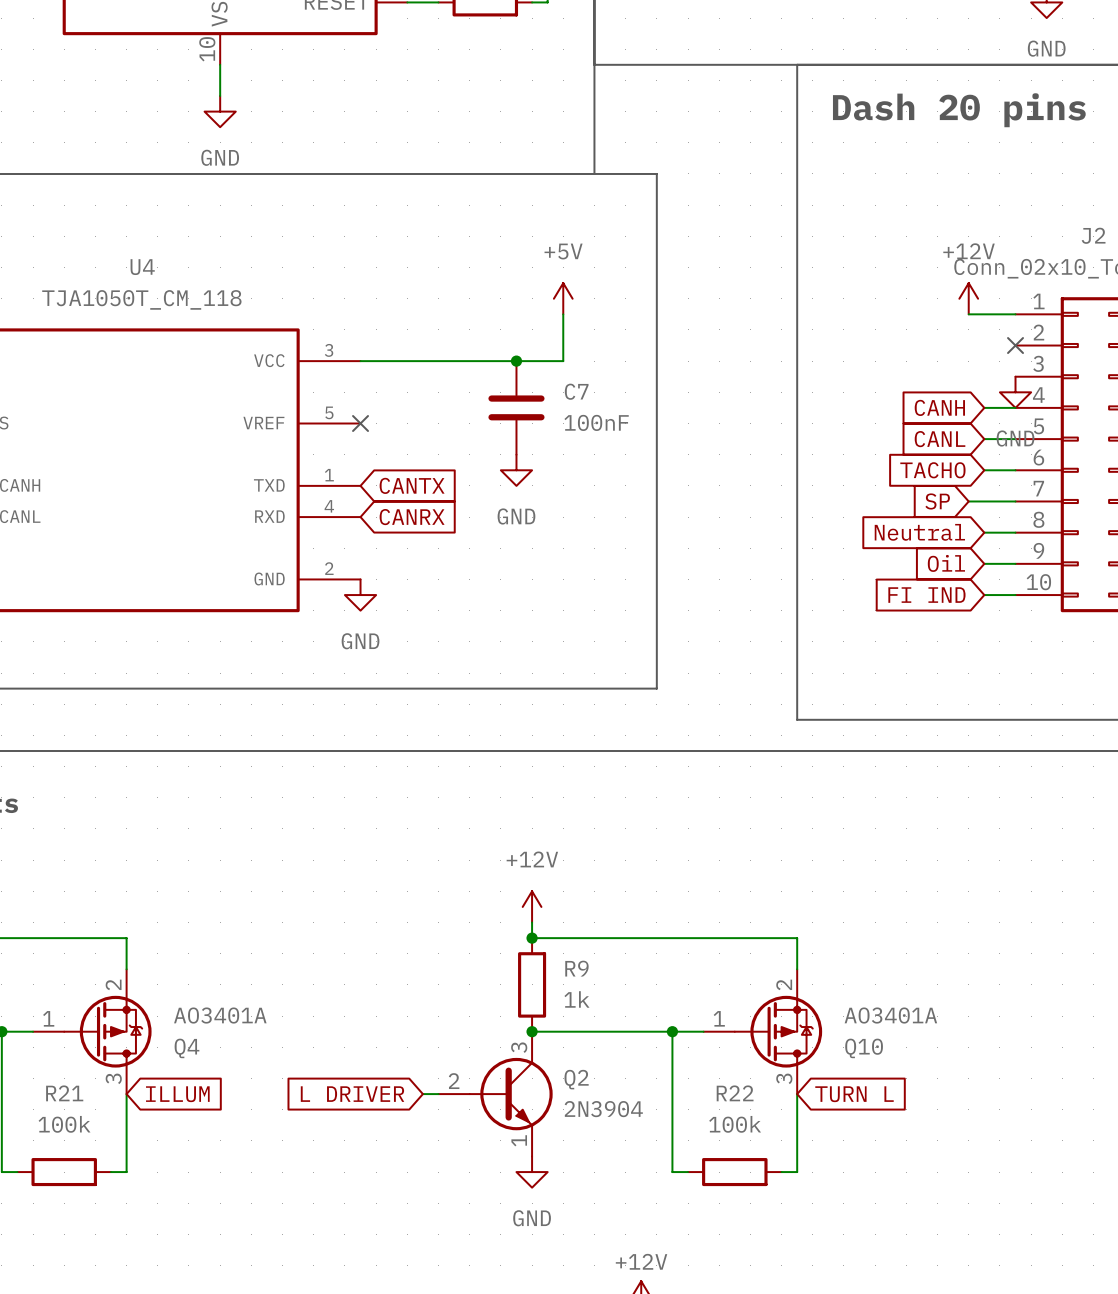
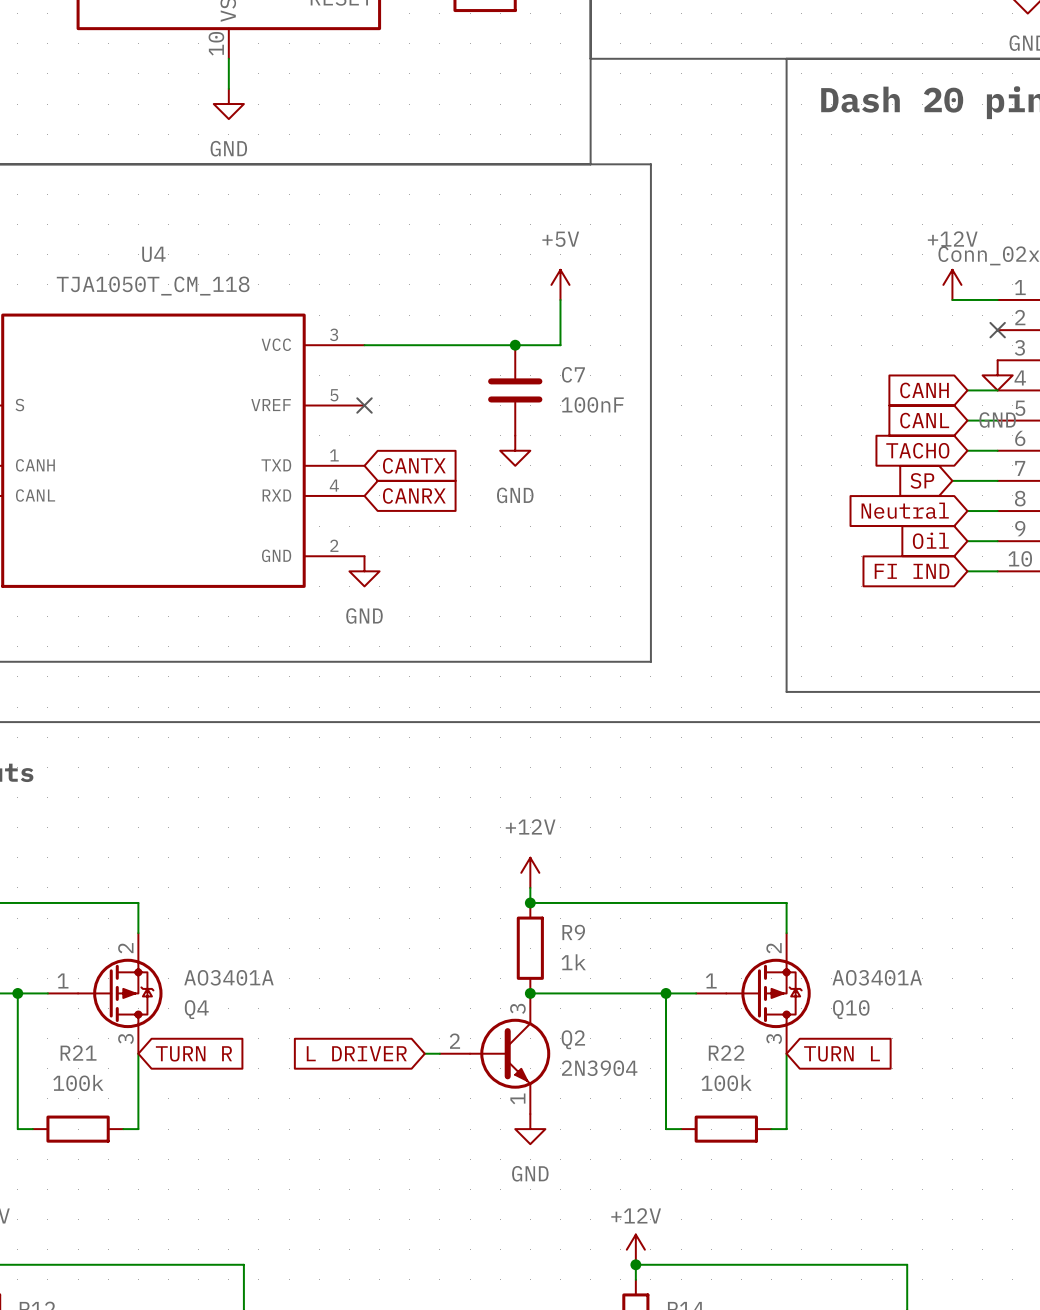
global label: ILLUM (177, 1094) -> TURN R (193, 1053)

